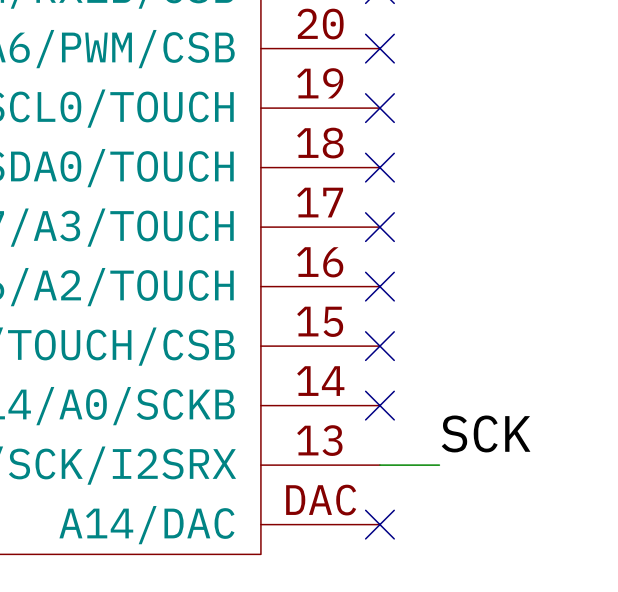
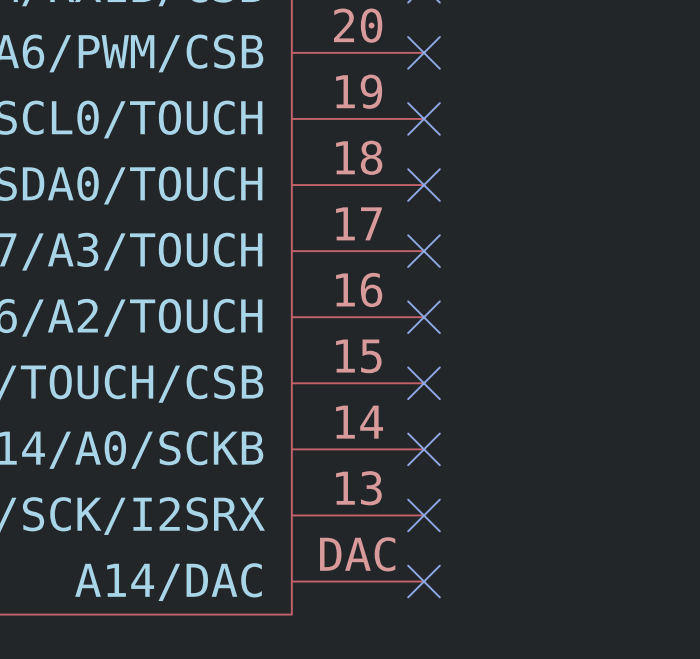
label: SCK (486, 433) -> none
wire: (379, 465) (439, 465) -> none
no-connect mark: none -> (424, 515)

